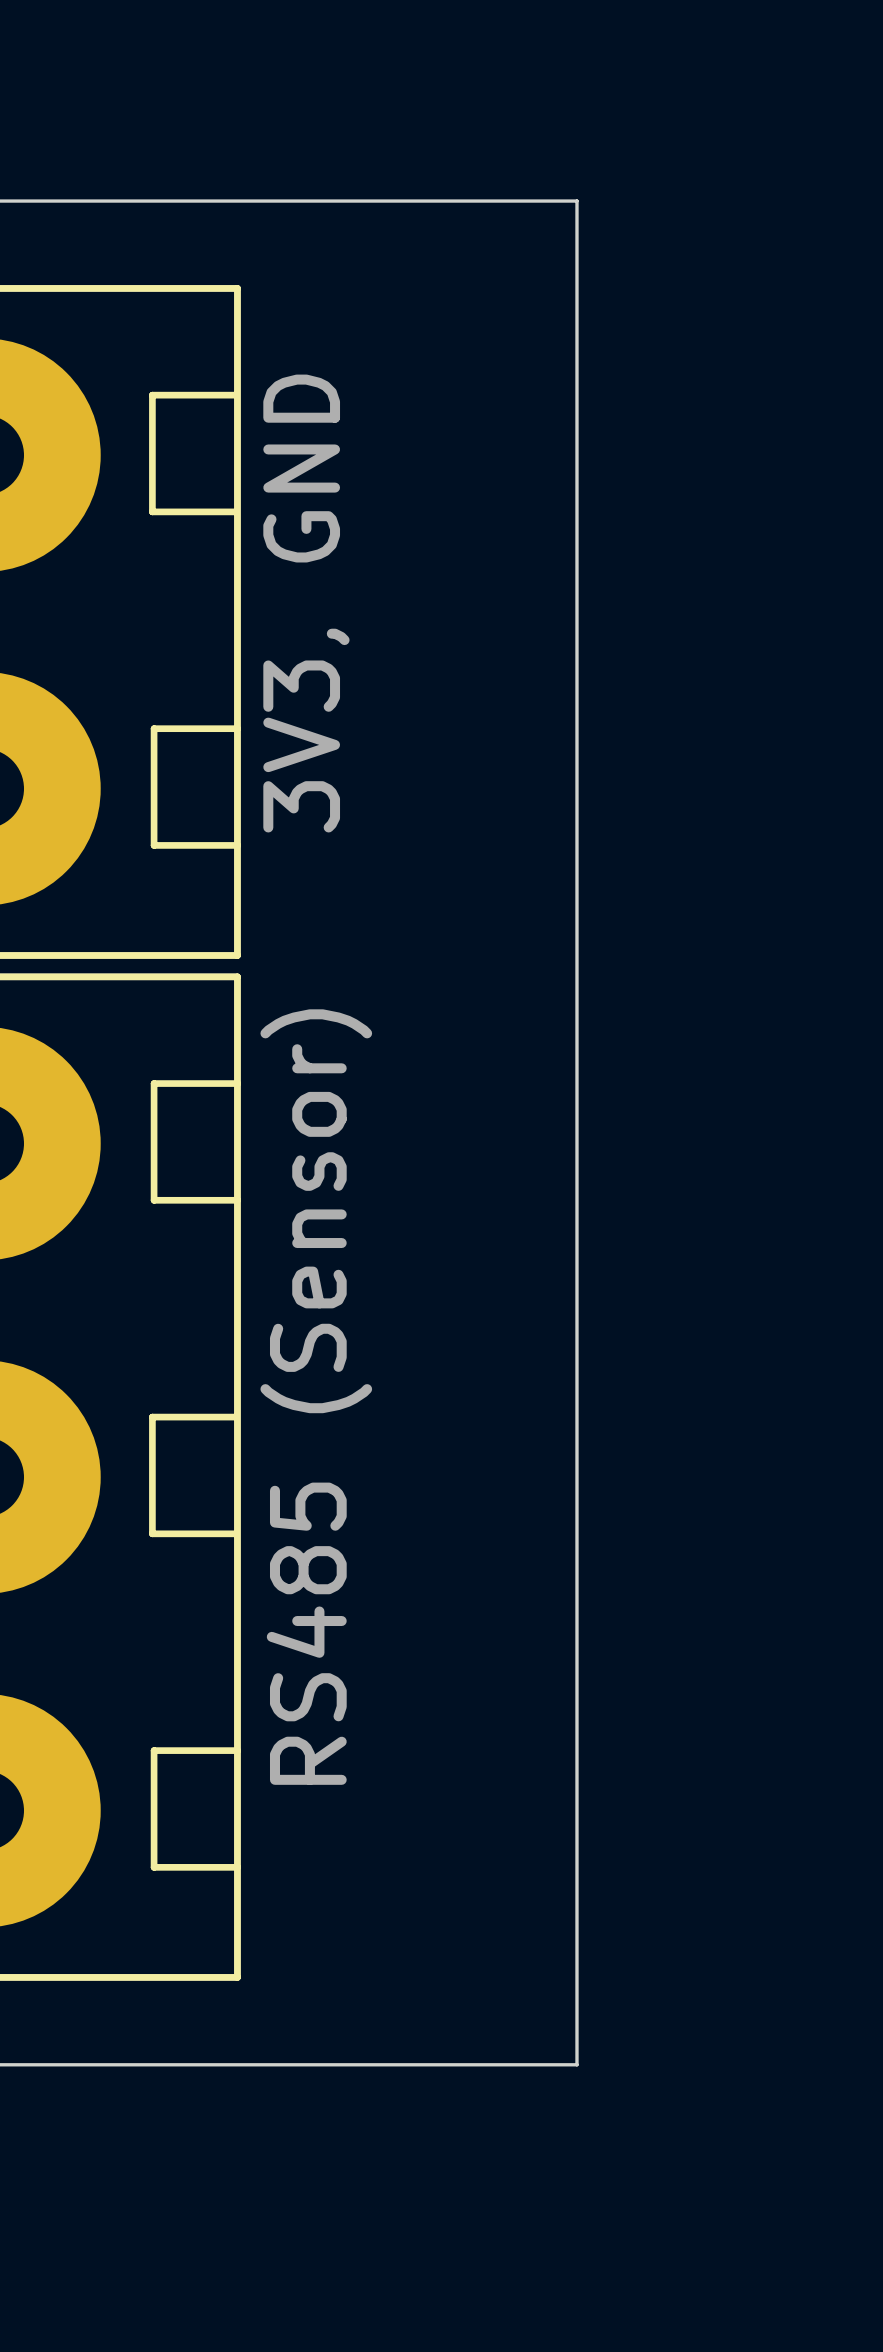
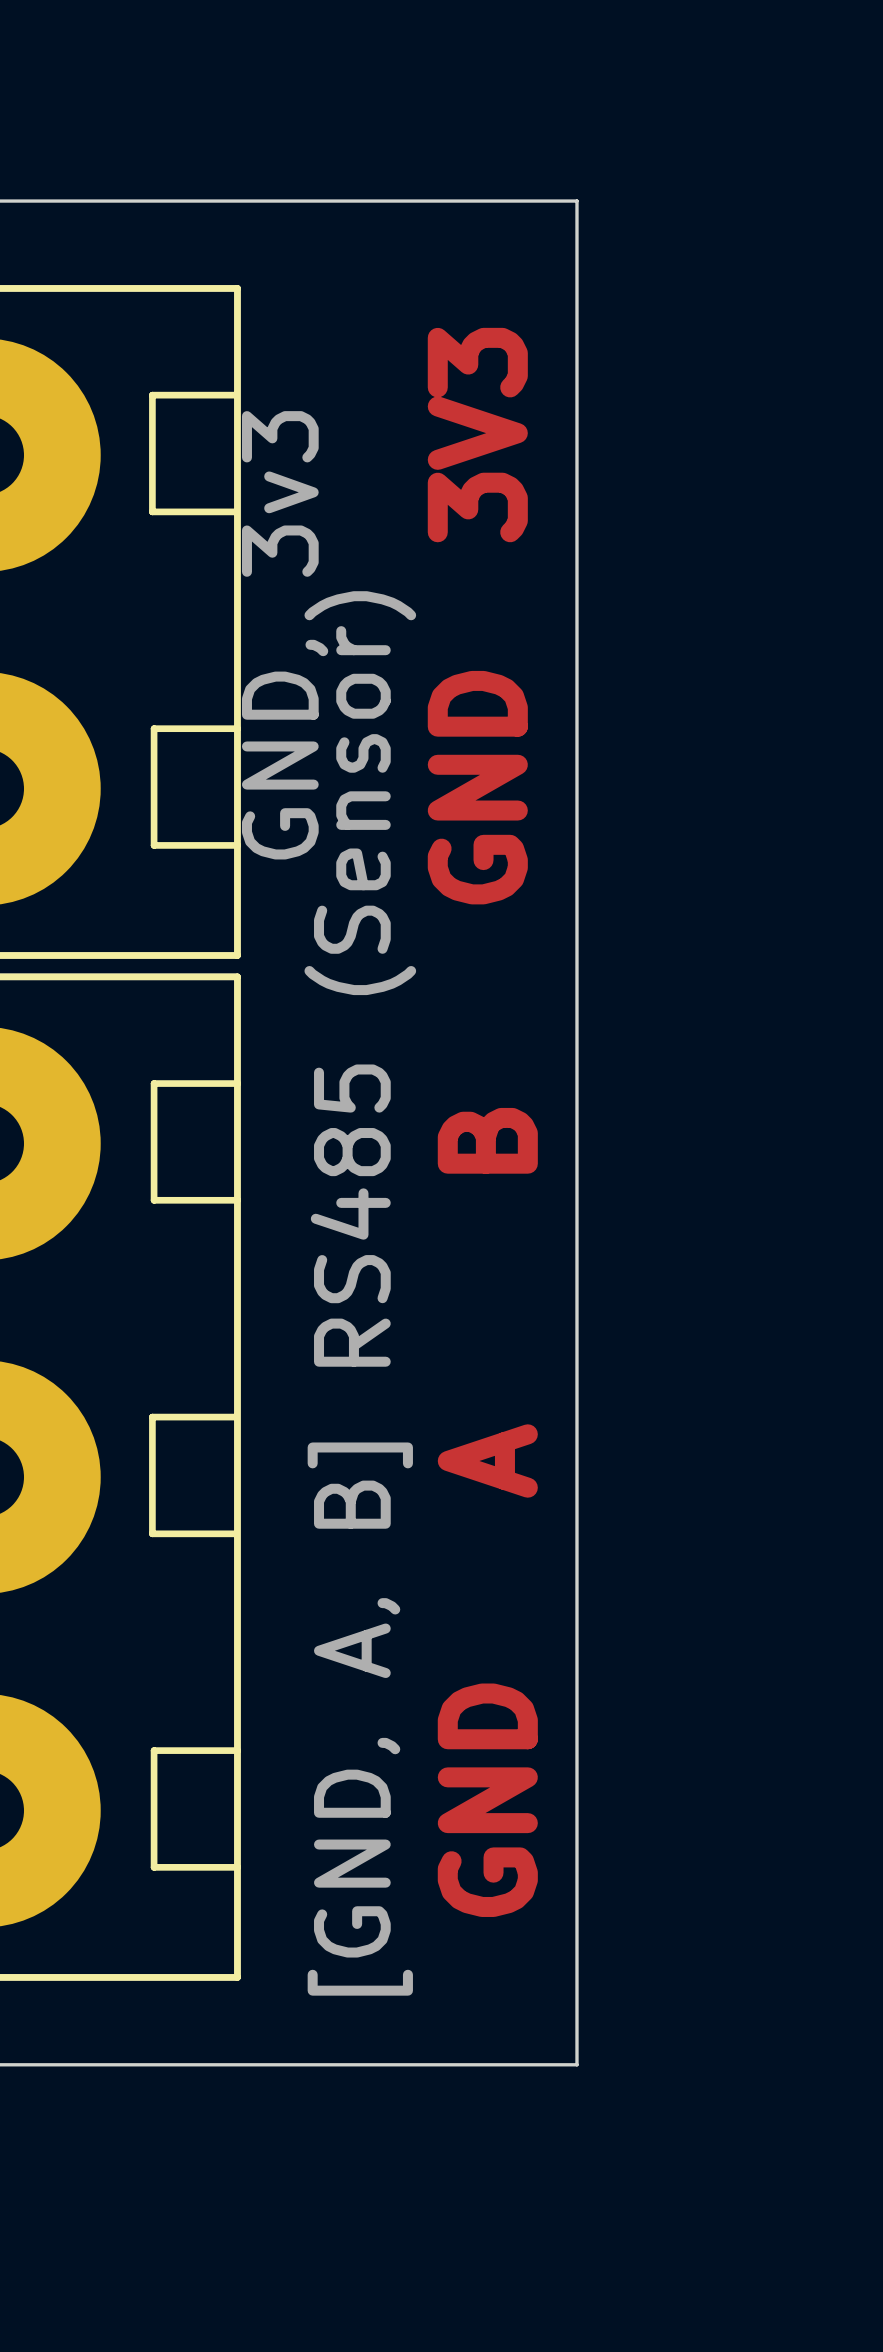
part value: 3V3, GND (306, 603) -> GND, 3v3 (285, 635)
text: none -> GND 3V3 (477, 616)
part value: RS485 (Sensor) (316, 1397) -> [GND, A, B] RS485 (Sensor) (360, 1293)
text: none -> GND A B (487, 1512)

